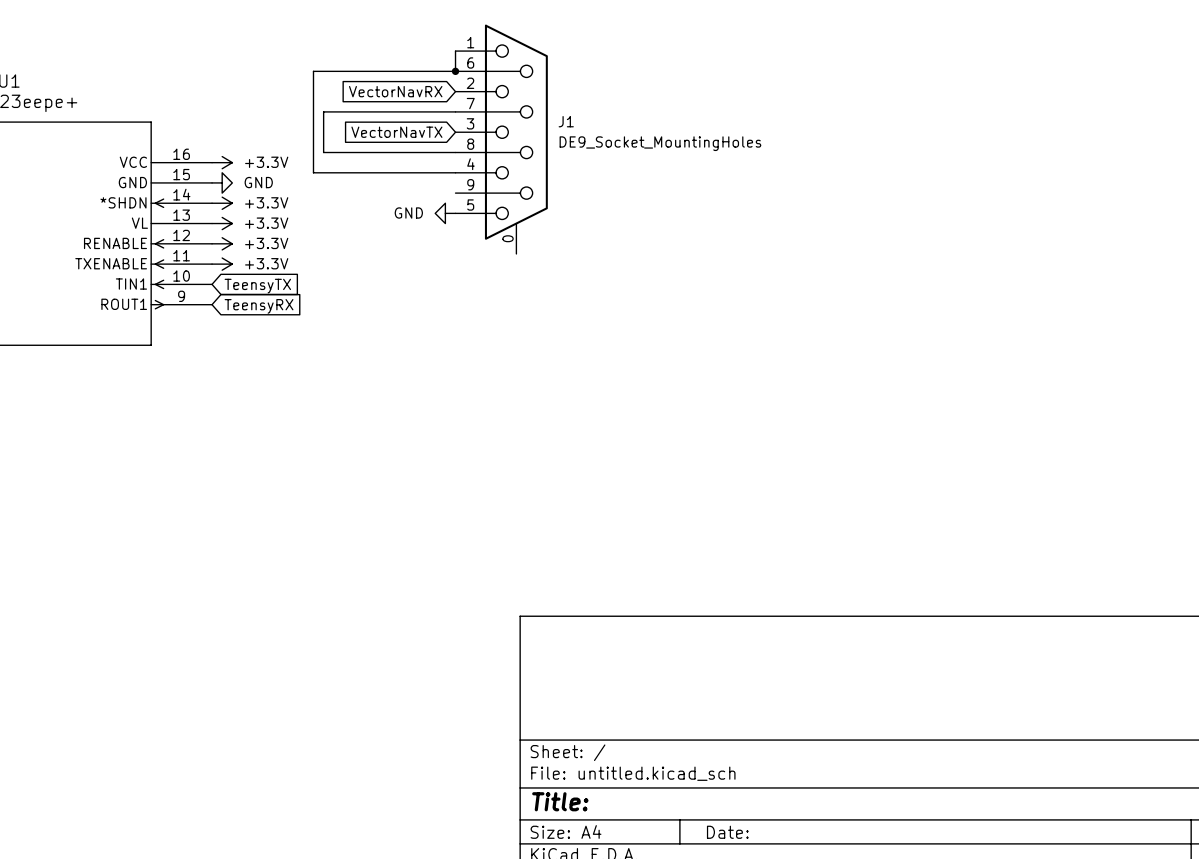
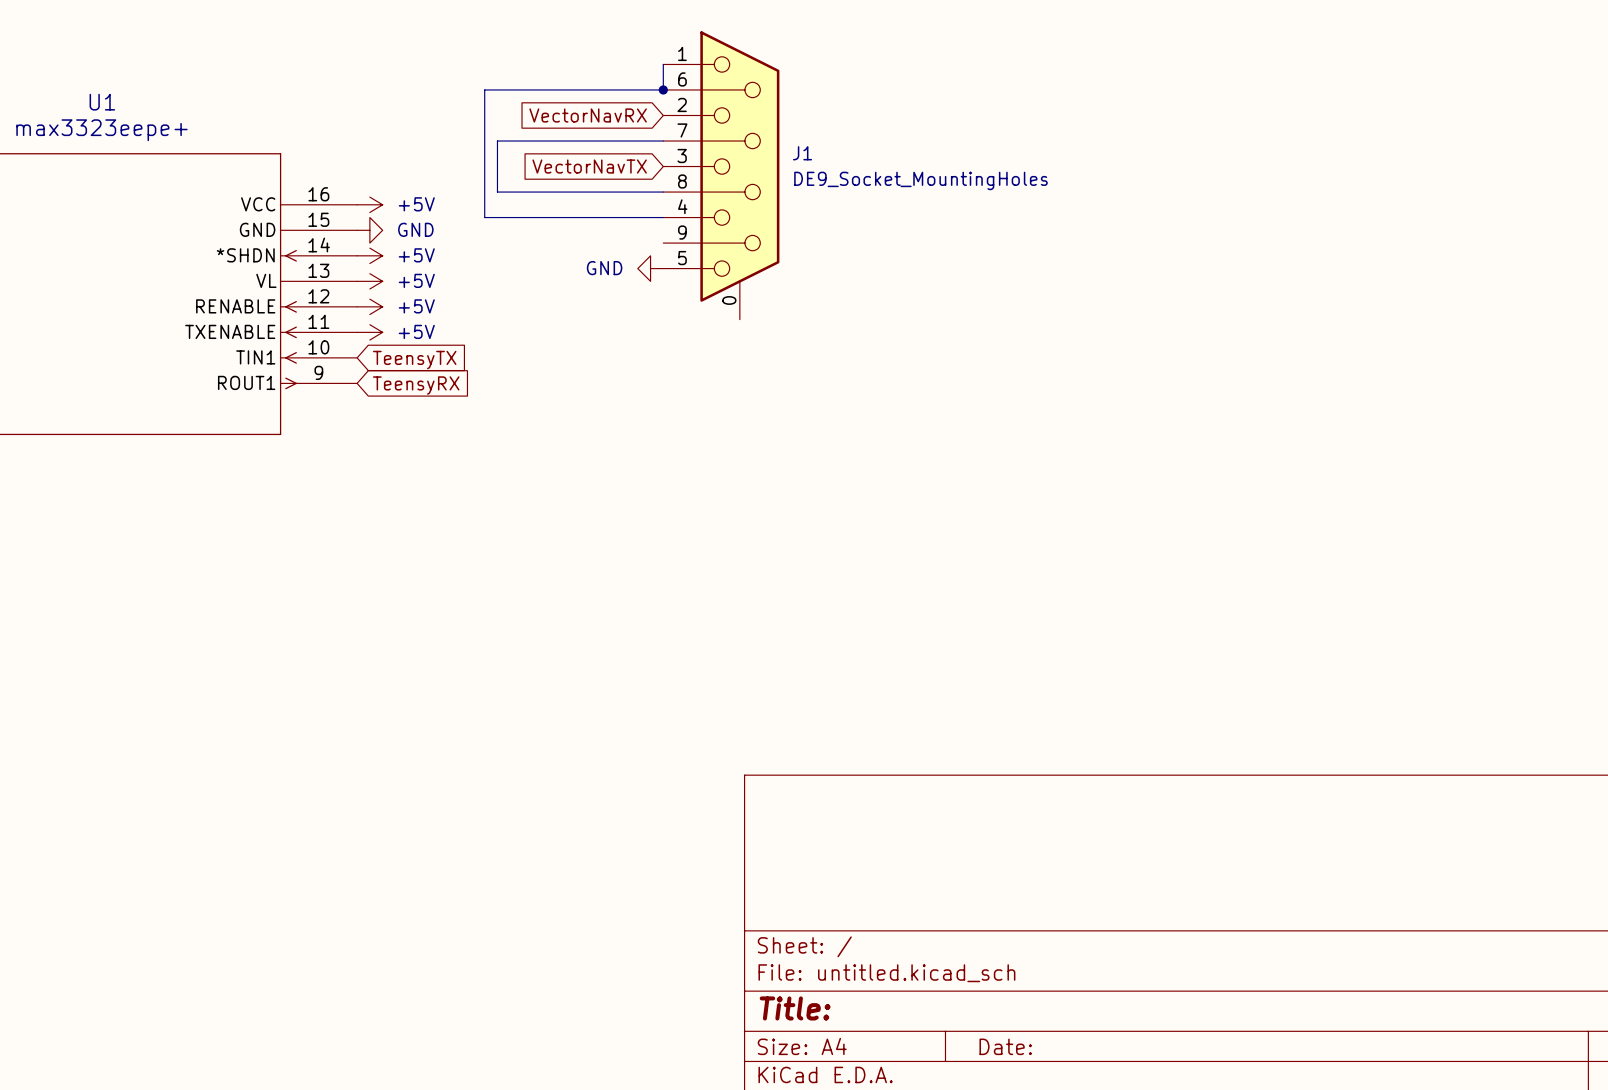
power symbol: +3.3V (222, 162) -> +5V (369, 204)
power symbol: +3.3V (222, 203) -> +5V (369, 255)
power symbol: +3.3V (222, 223) -> +5V (369, 281)
power symbol: +3.3V (222, 243) -> +5V (369, 306)
power symbol: +3.3V (222, 264) -> +5V (369, 332)

